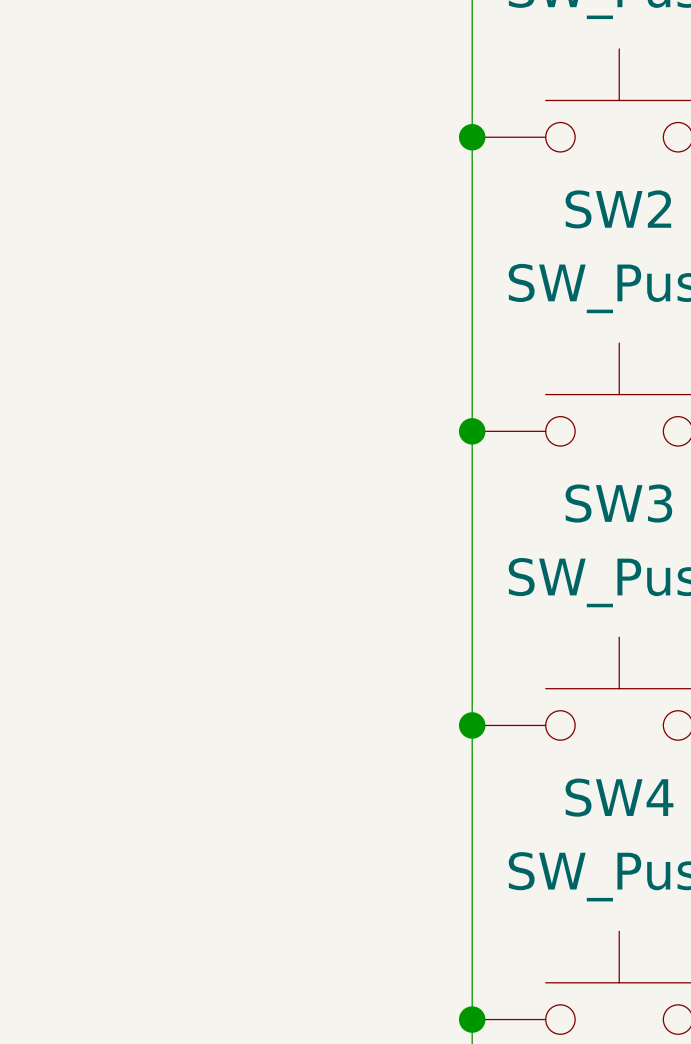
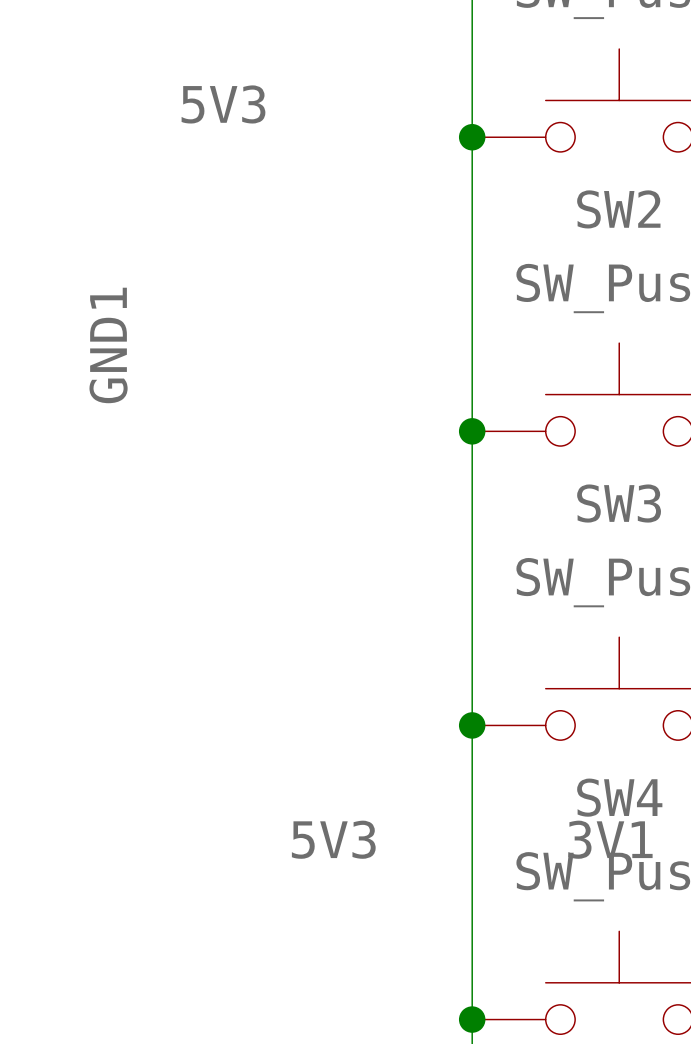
label: none -> 5V3 (223, 104)
label: none -> GND1 (108, 345)
label: none -> 5V3 (333, 839)
label: none -> 3V1 (610, 839)

